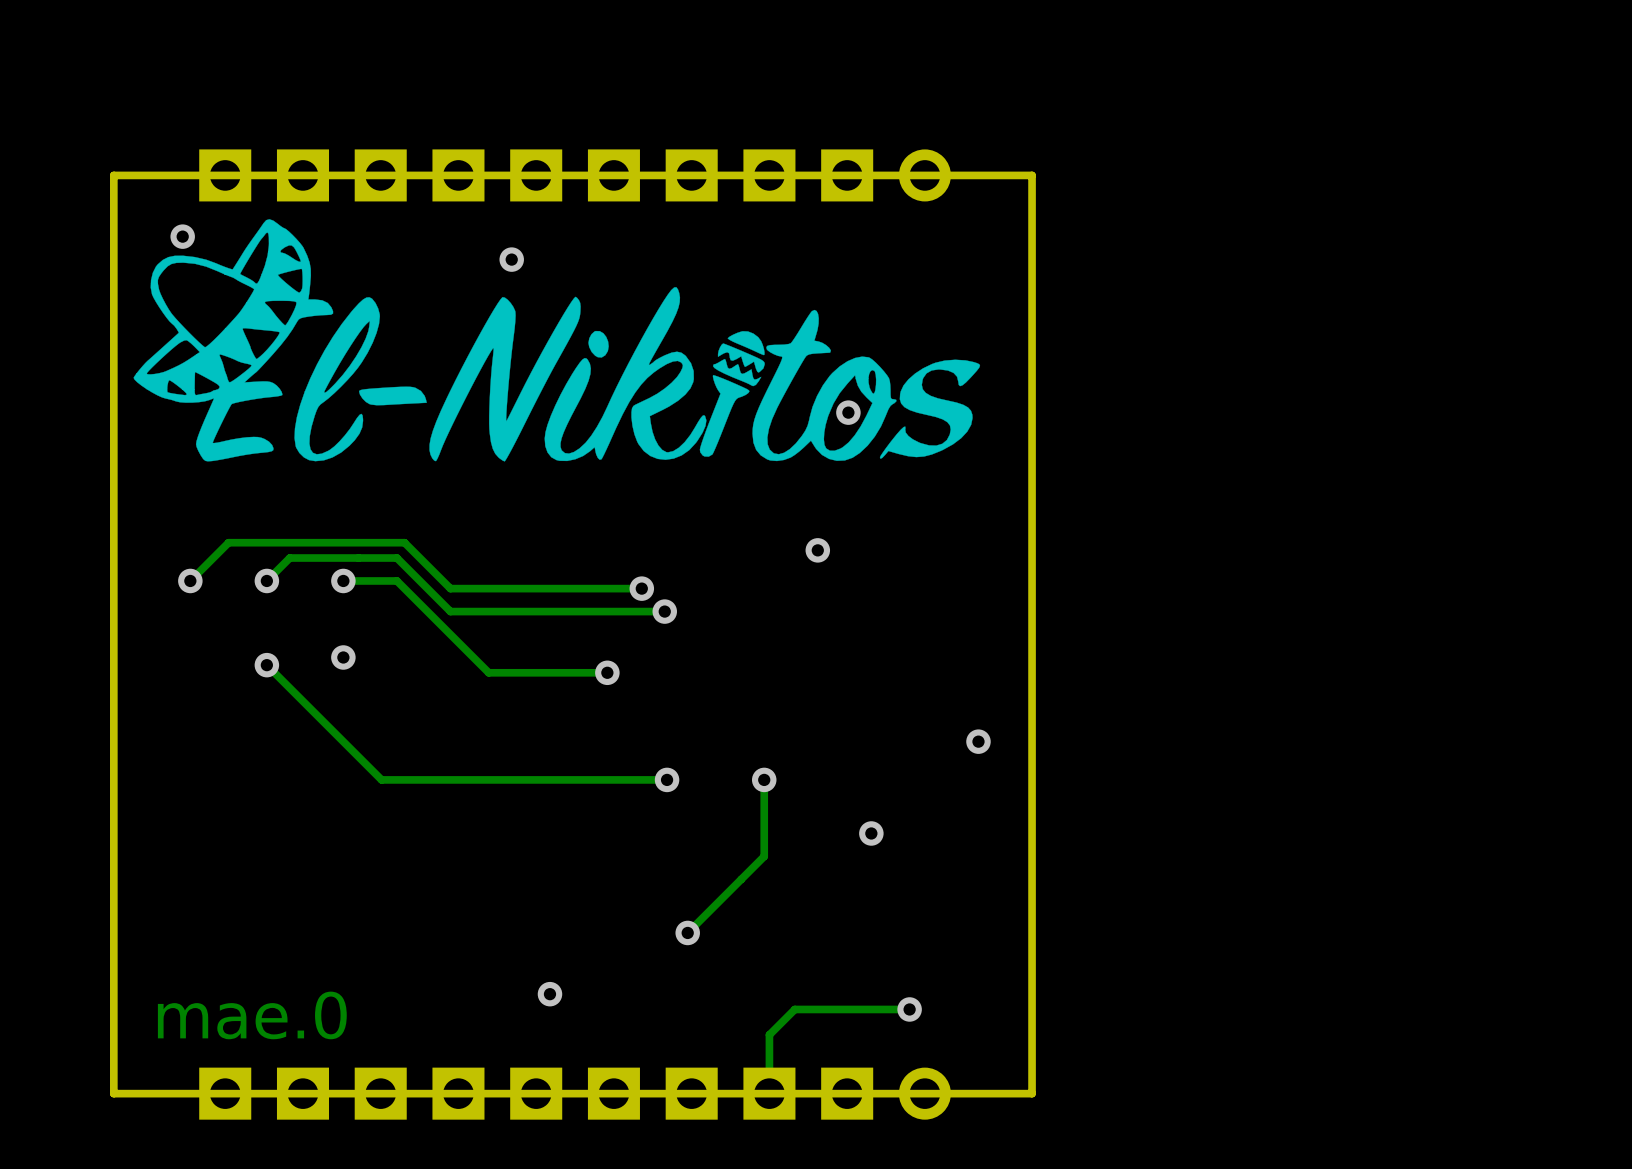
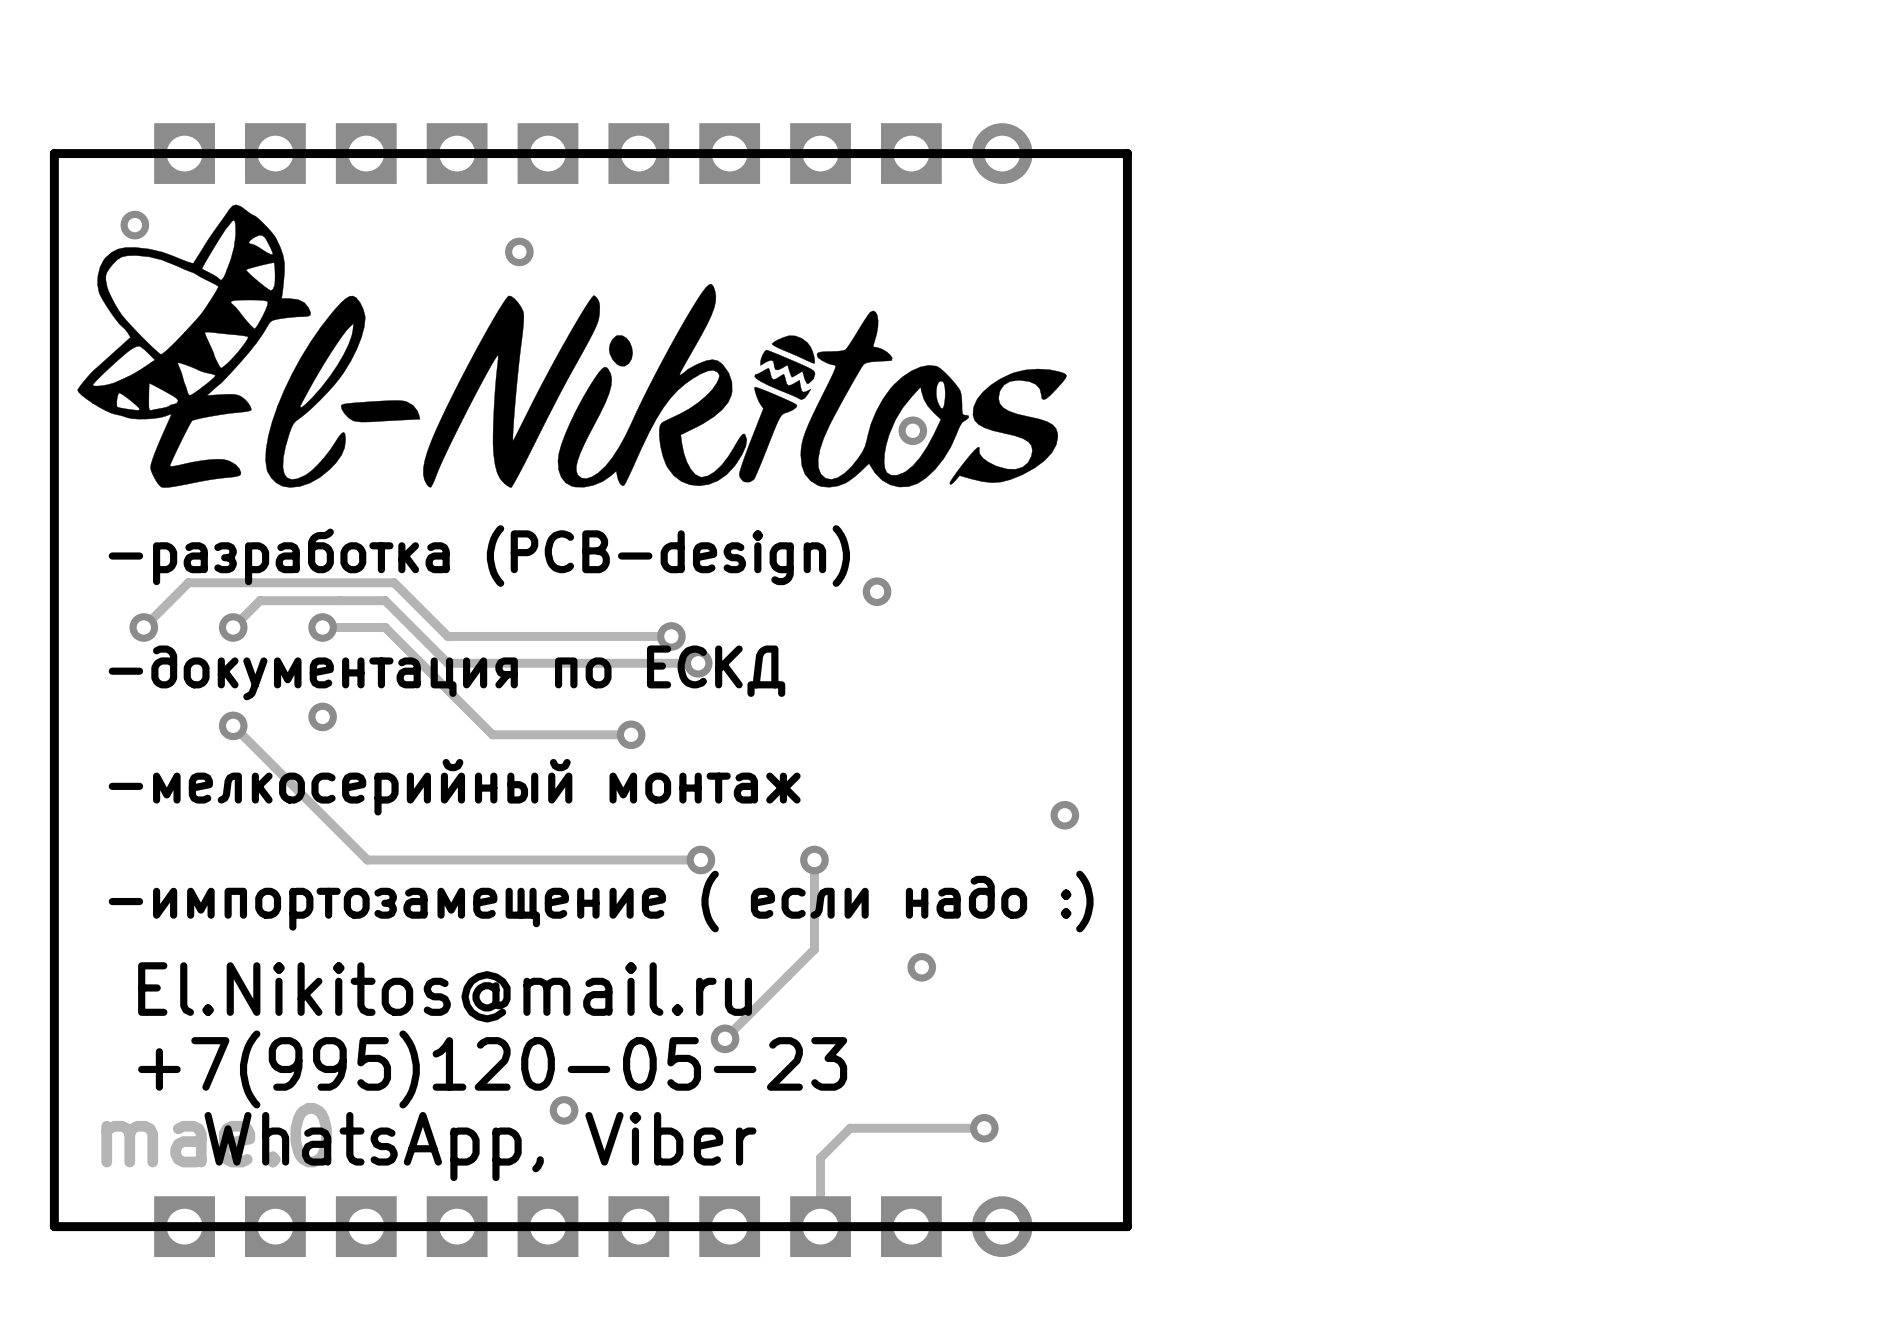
text: none -> -разработка (PCB-design) (479, 556)
text: none -> -документация по ЕСКД (446, 672)
text: none -> -мелкосерийный монтаж (454, 787)
text: none -> -импортозамещение ( если надо :) (601, 901)
via position: (871, 833) -> (921, 967)
text: none -> El.Nikitos@mail.ru (445, 992)
text: none -> +7(995)120-05-23 (492, 1069)
text: none -> WhatsApp, Viber (480, 1146)

